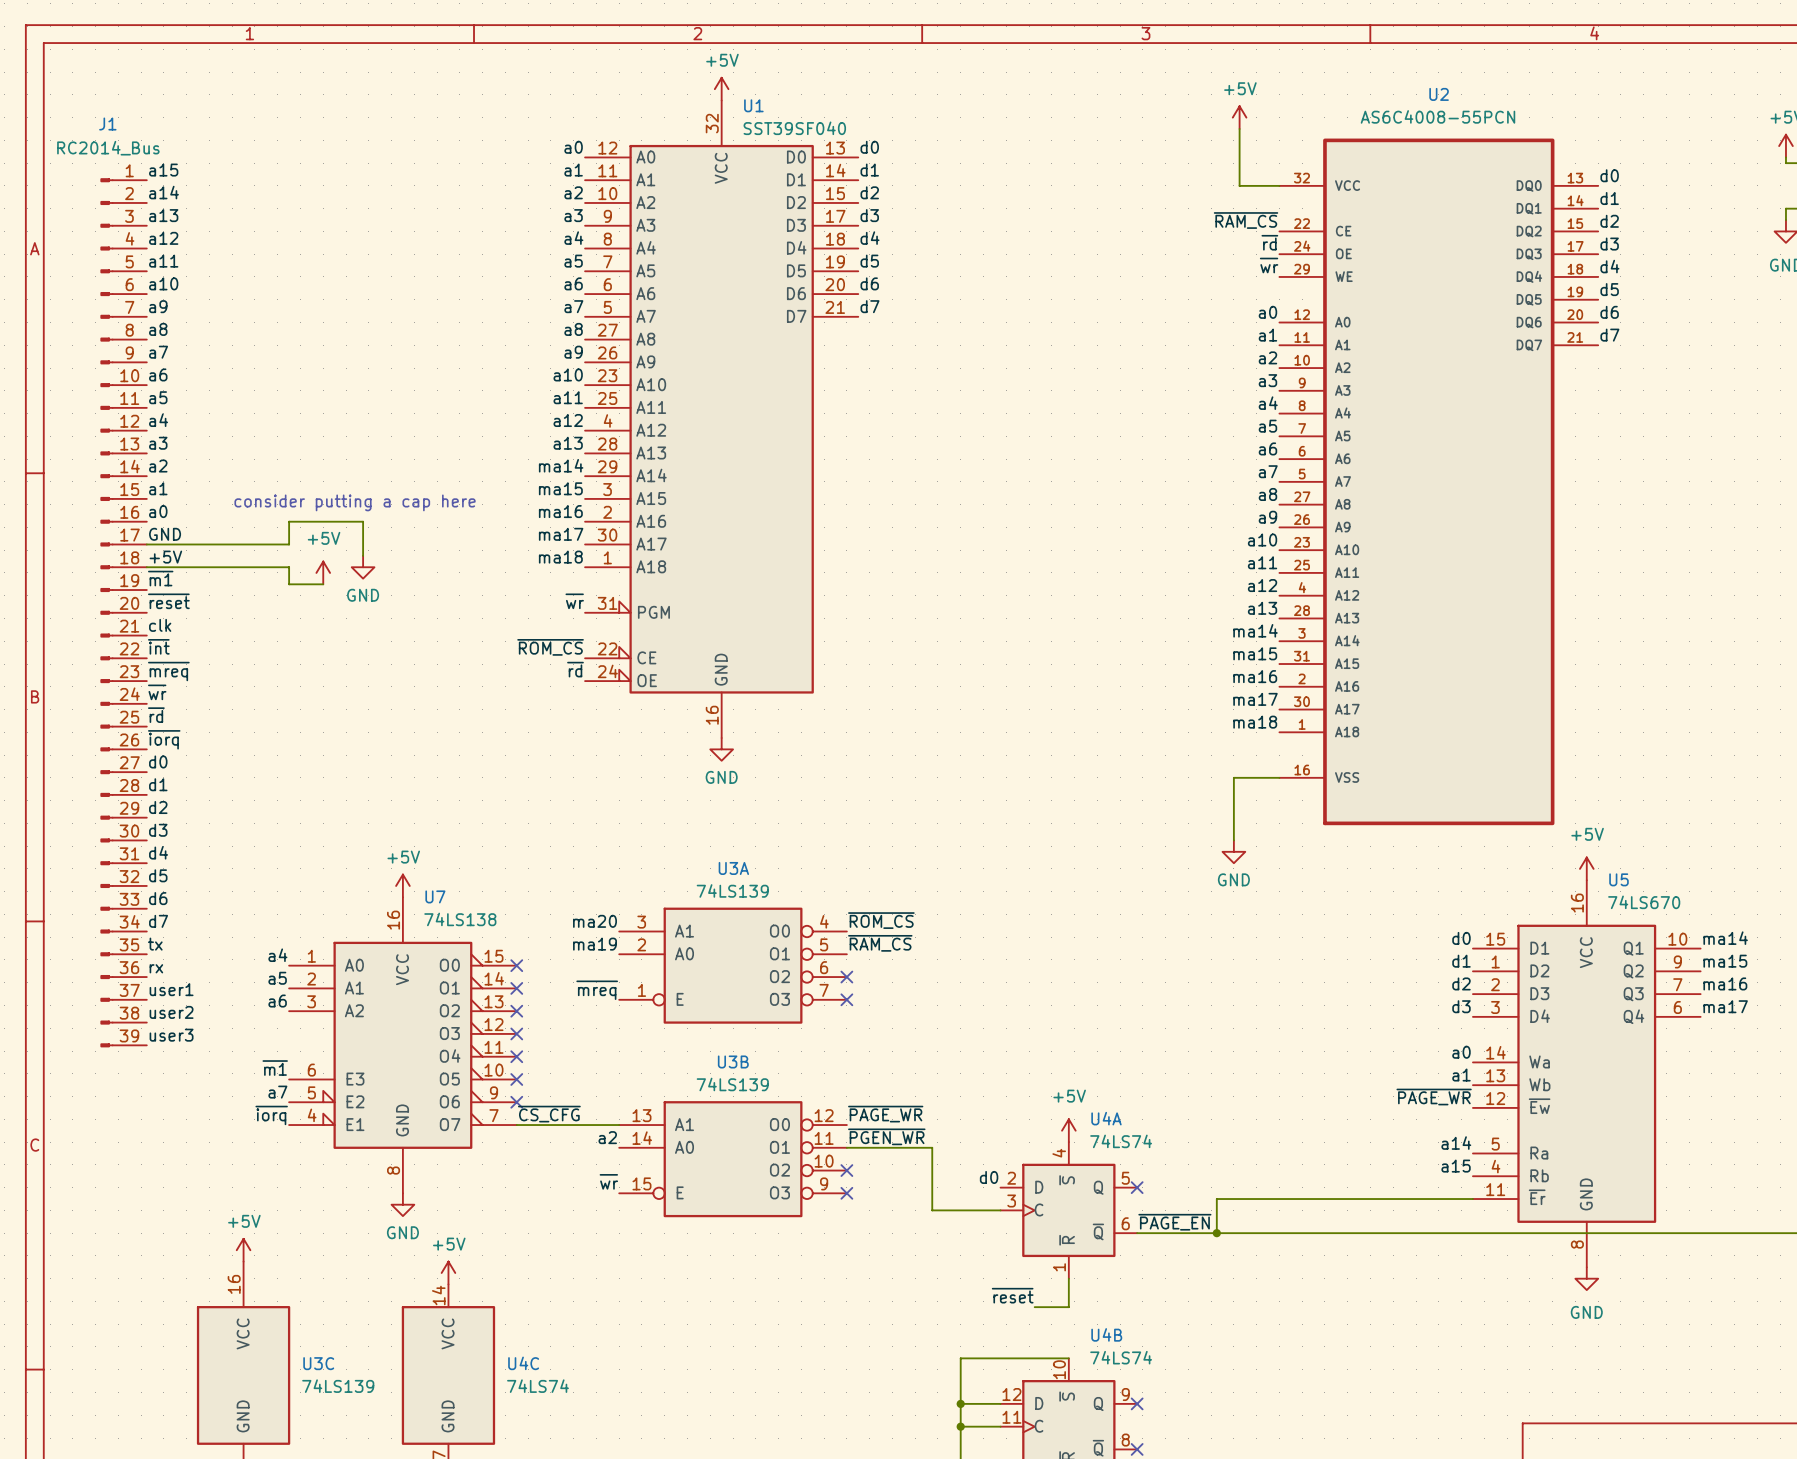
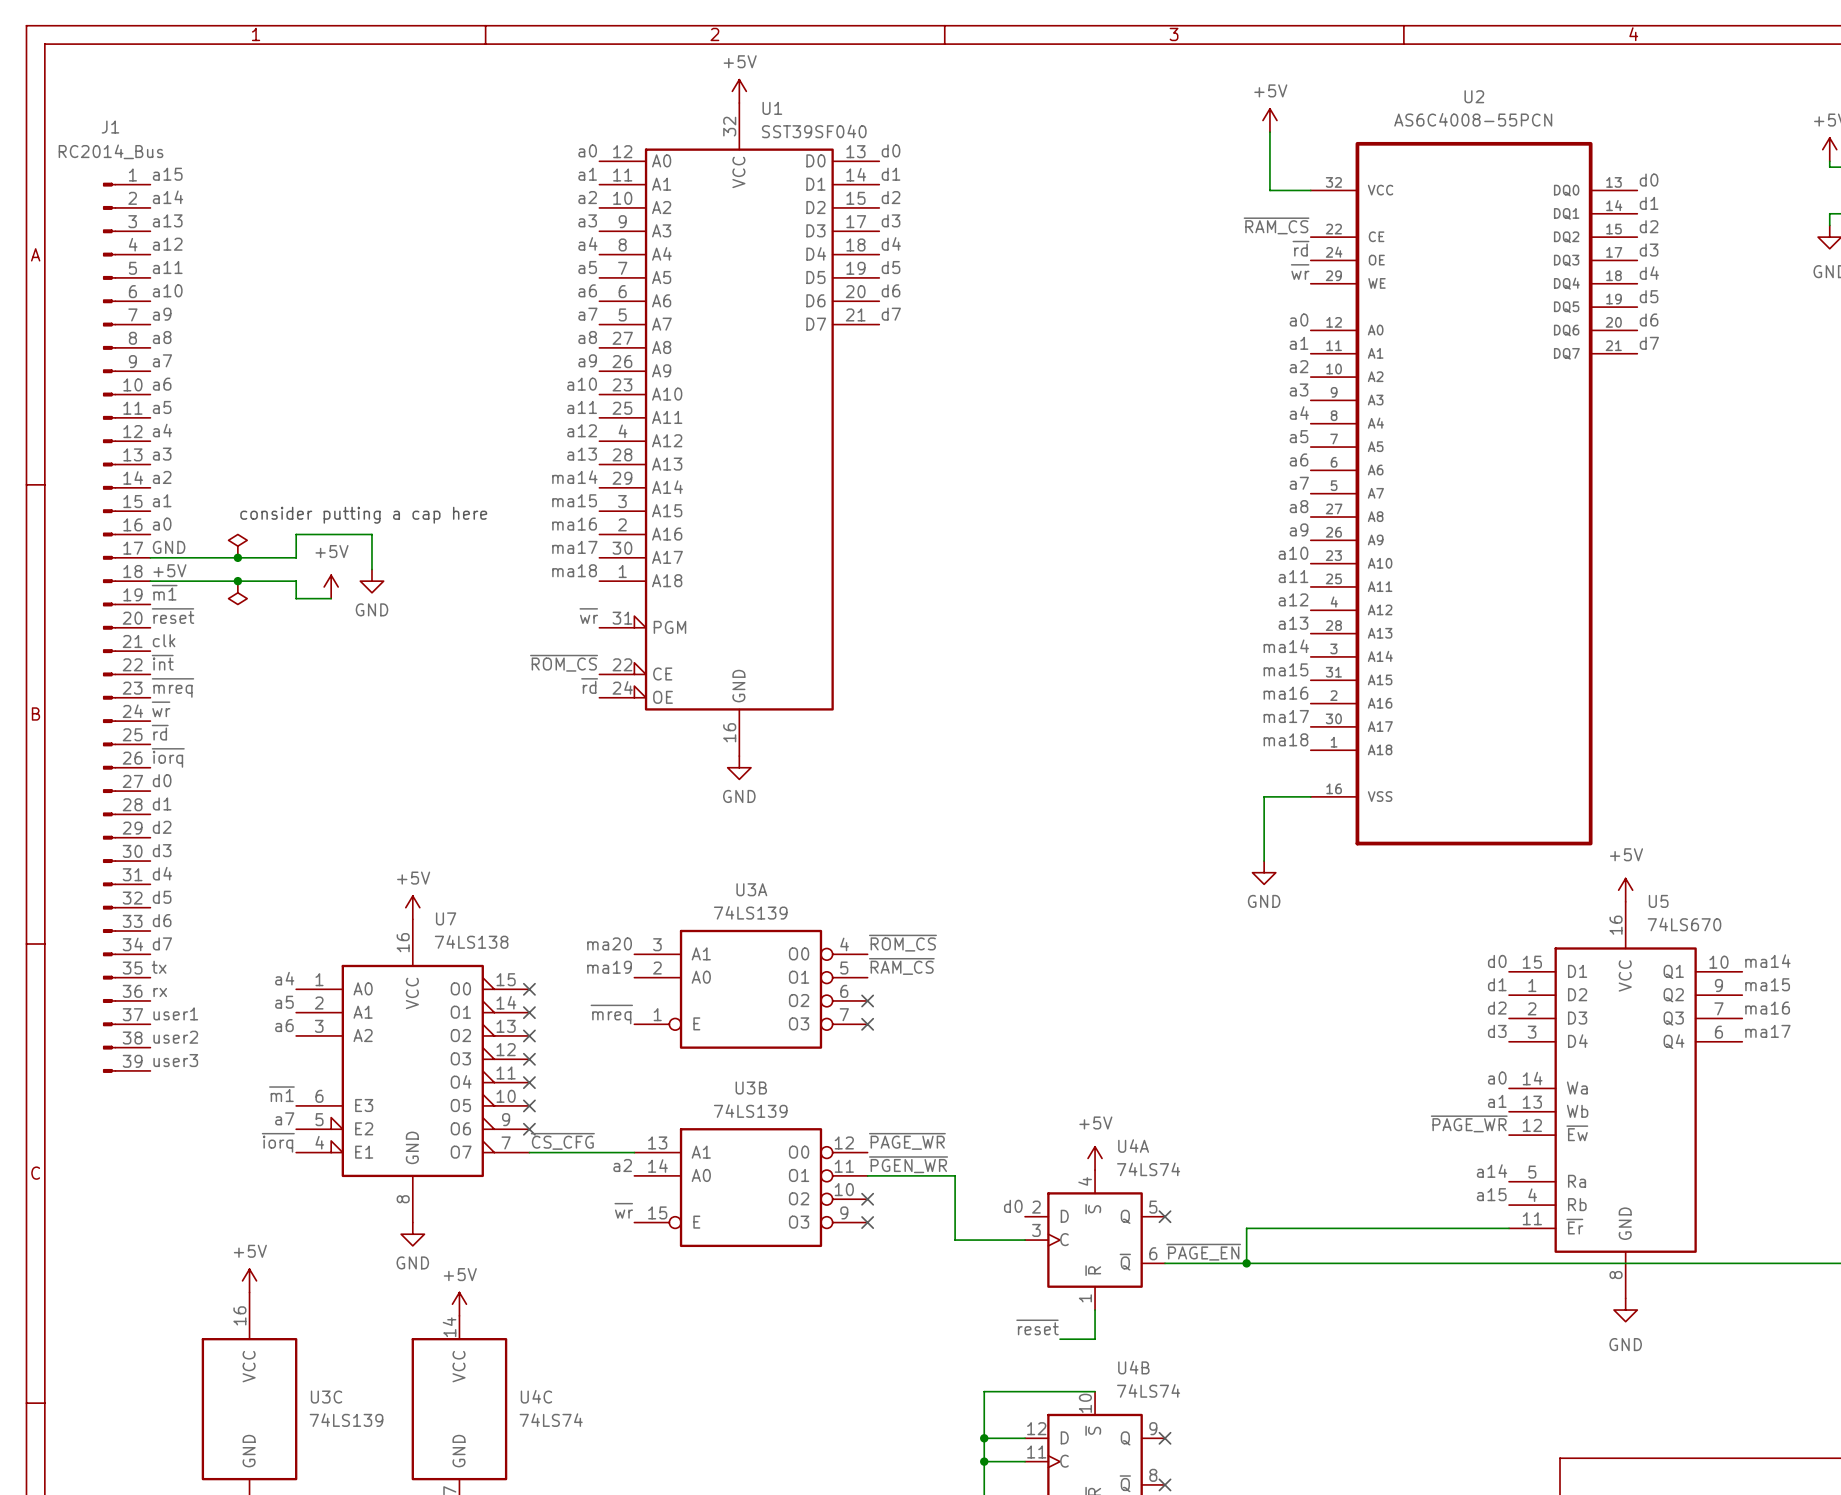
power symbol: none -> (237, 546)
junction: none -> (237, 557)
junction: none -> (237, 581)
power symbol: none -> (237, 592)

